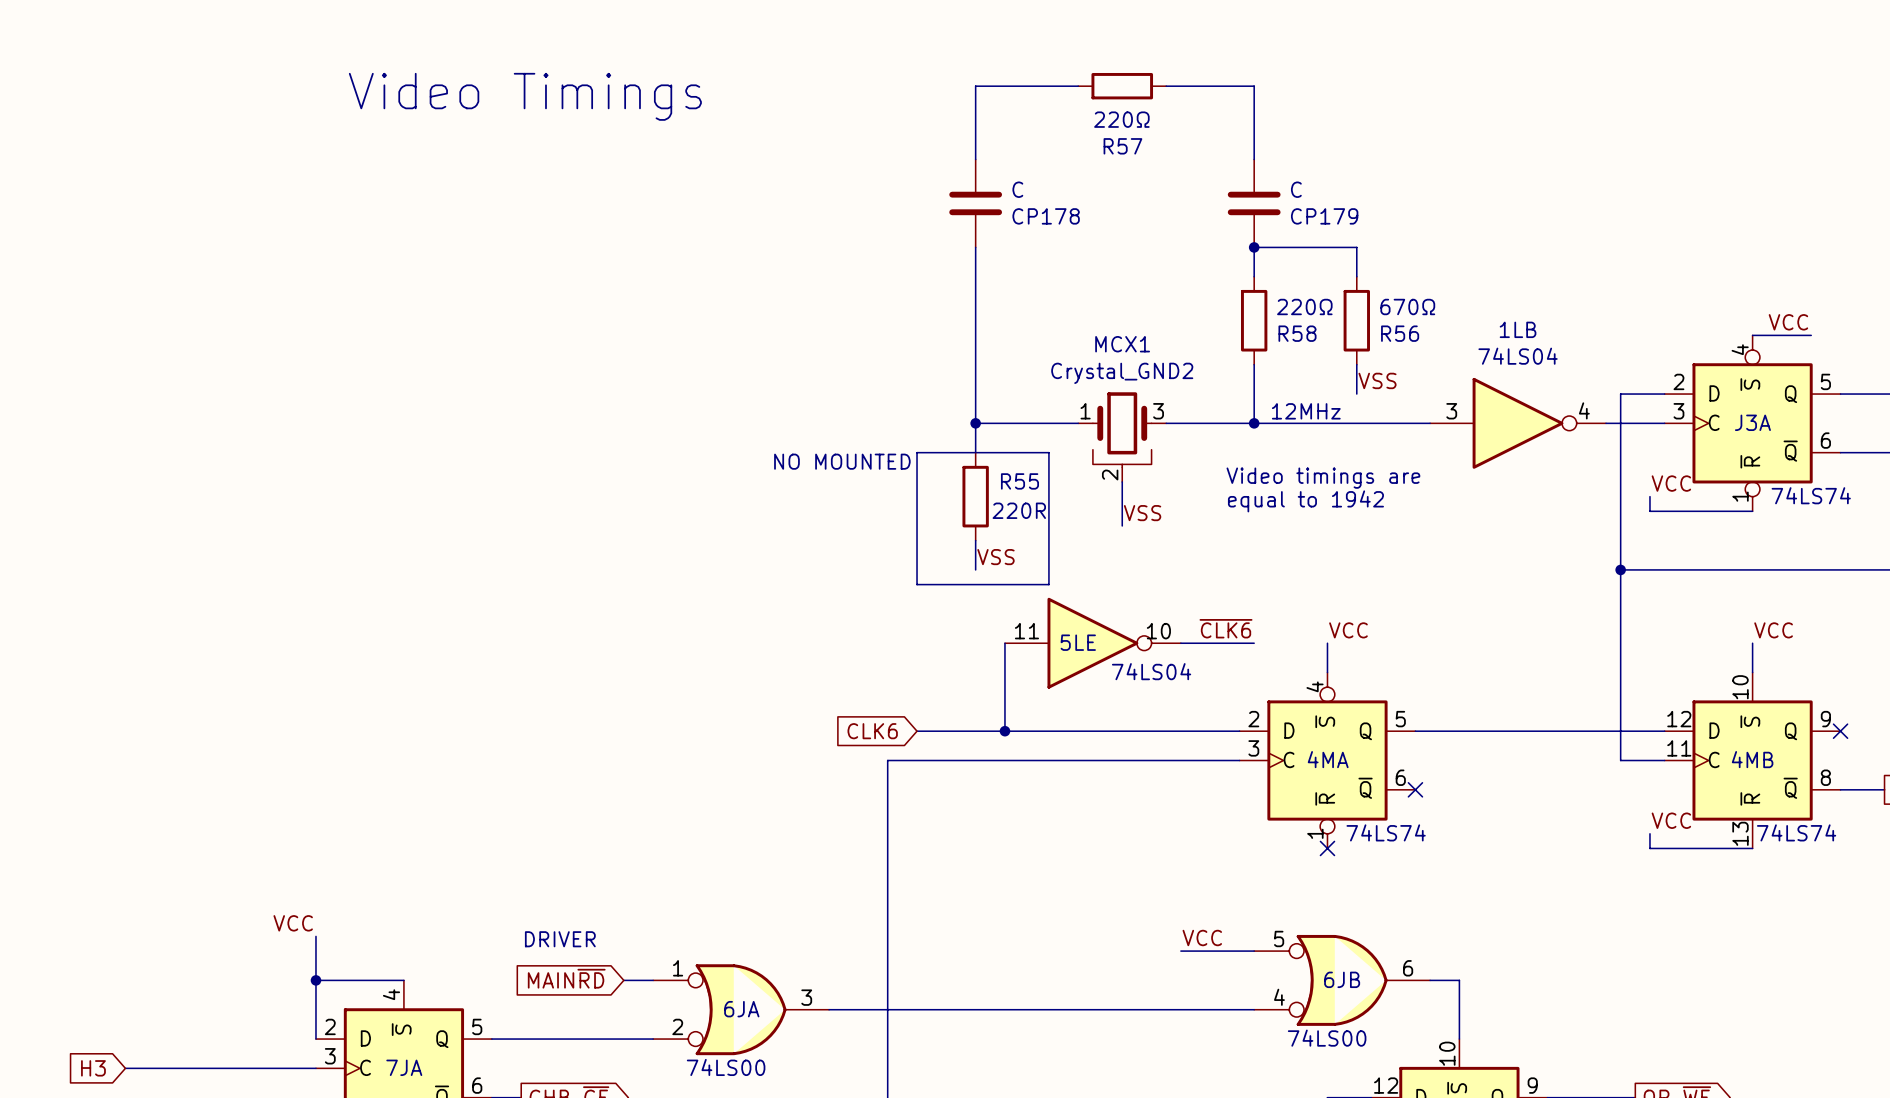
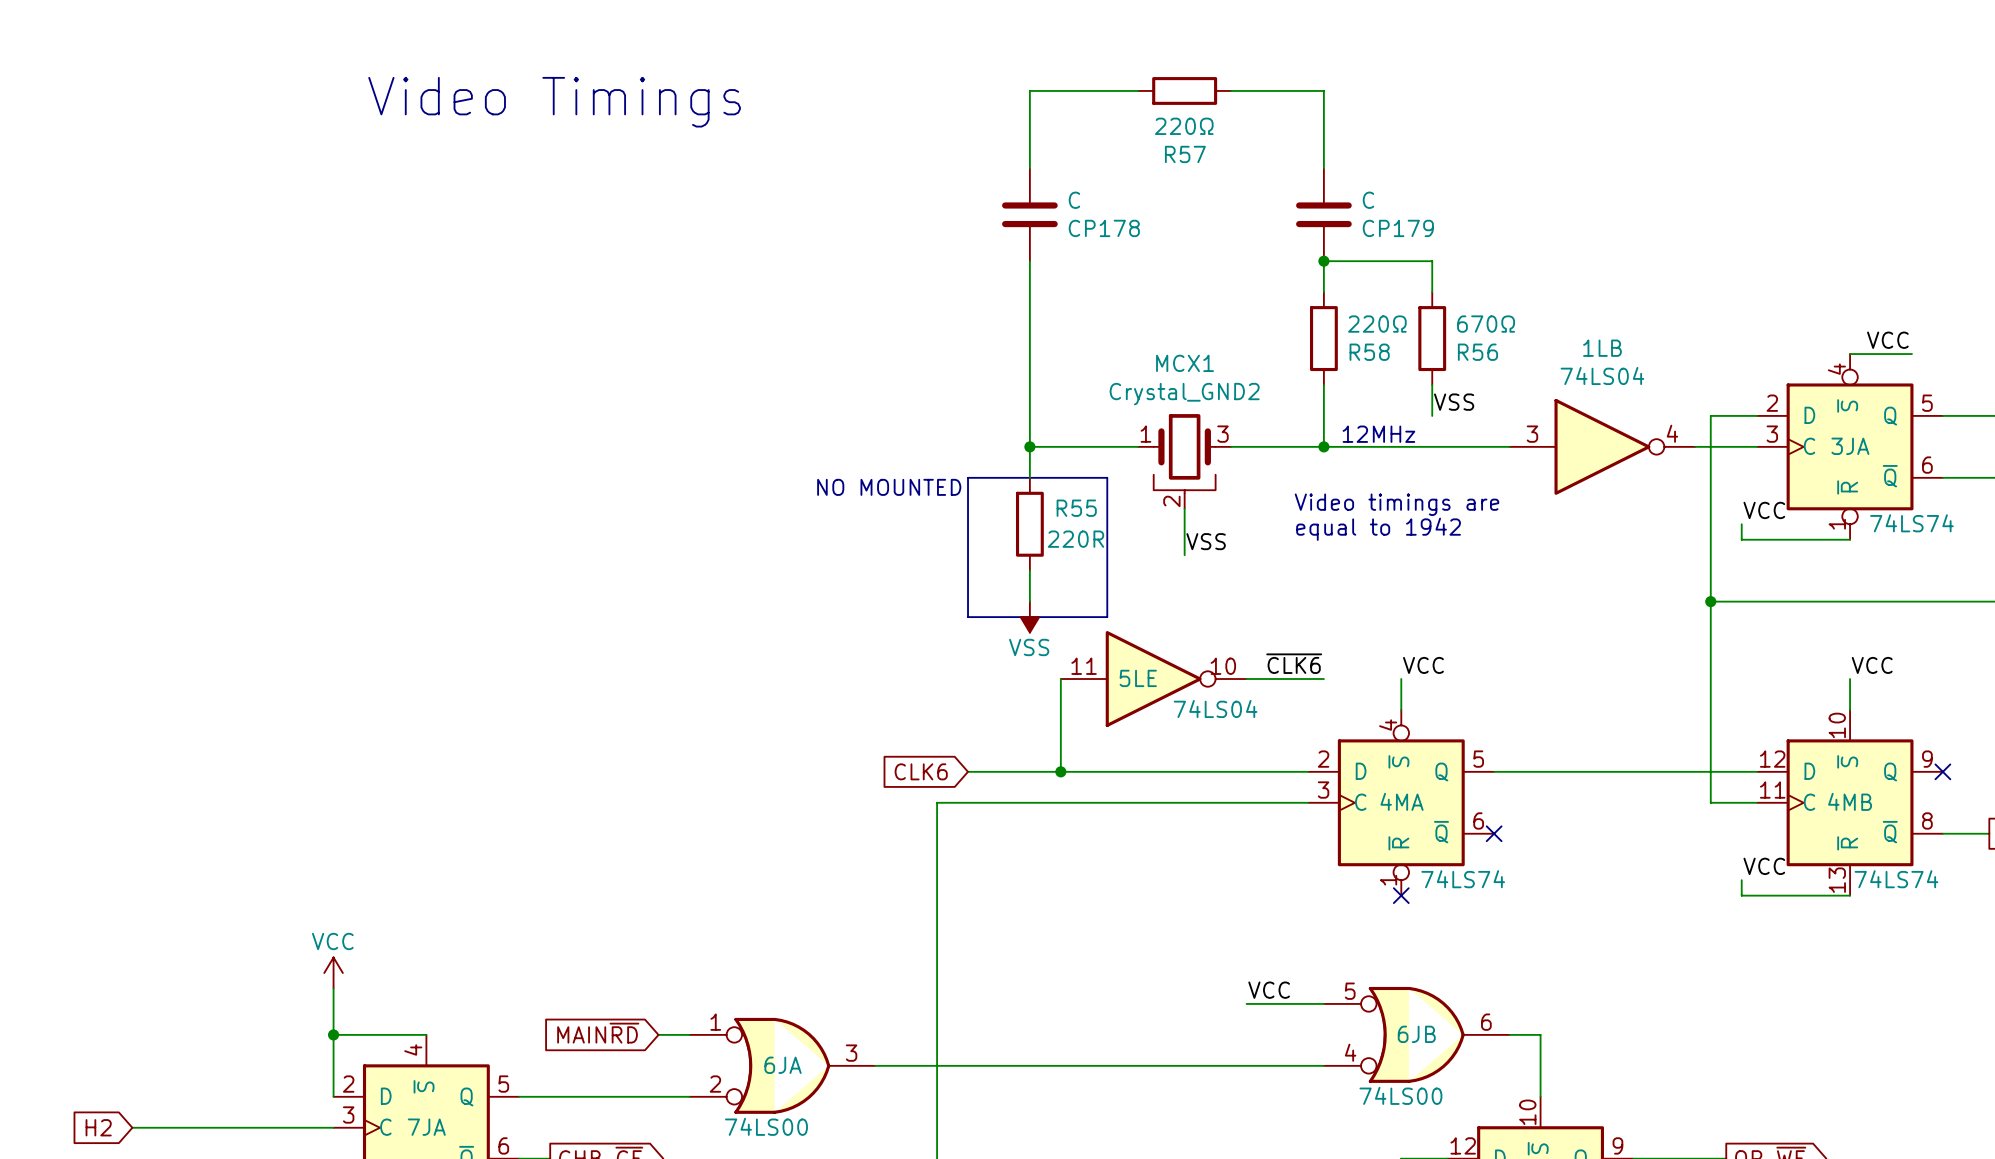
J3A name: J3A (1752, 422) -> 3JA (1850, 446)
label: VSS (995, 557) -> none
power symbol: none -> VSS (1029, 617)
power symbol: none -> VCC (333, 973)
label: VCC (293, 923) -> none
text: DRIVER (560, 939) -> none
global label: H3 (93, 1068) -> H2 (98, 1127)

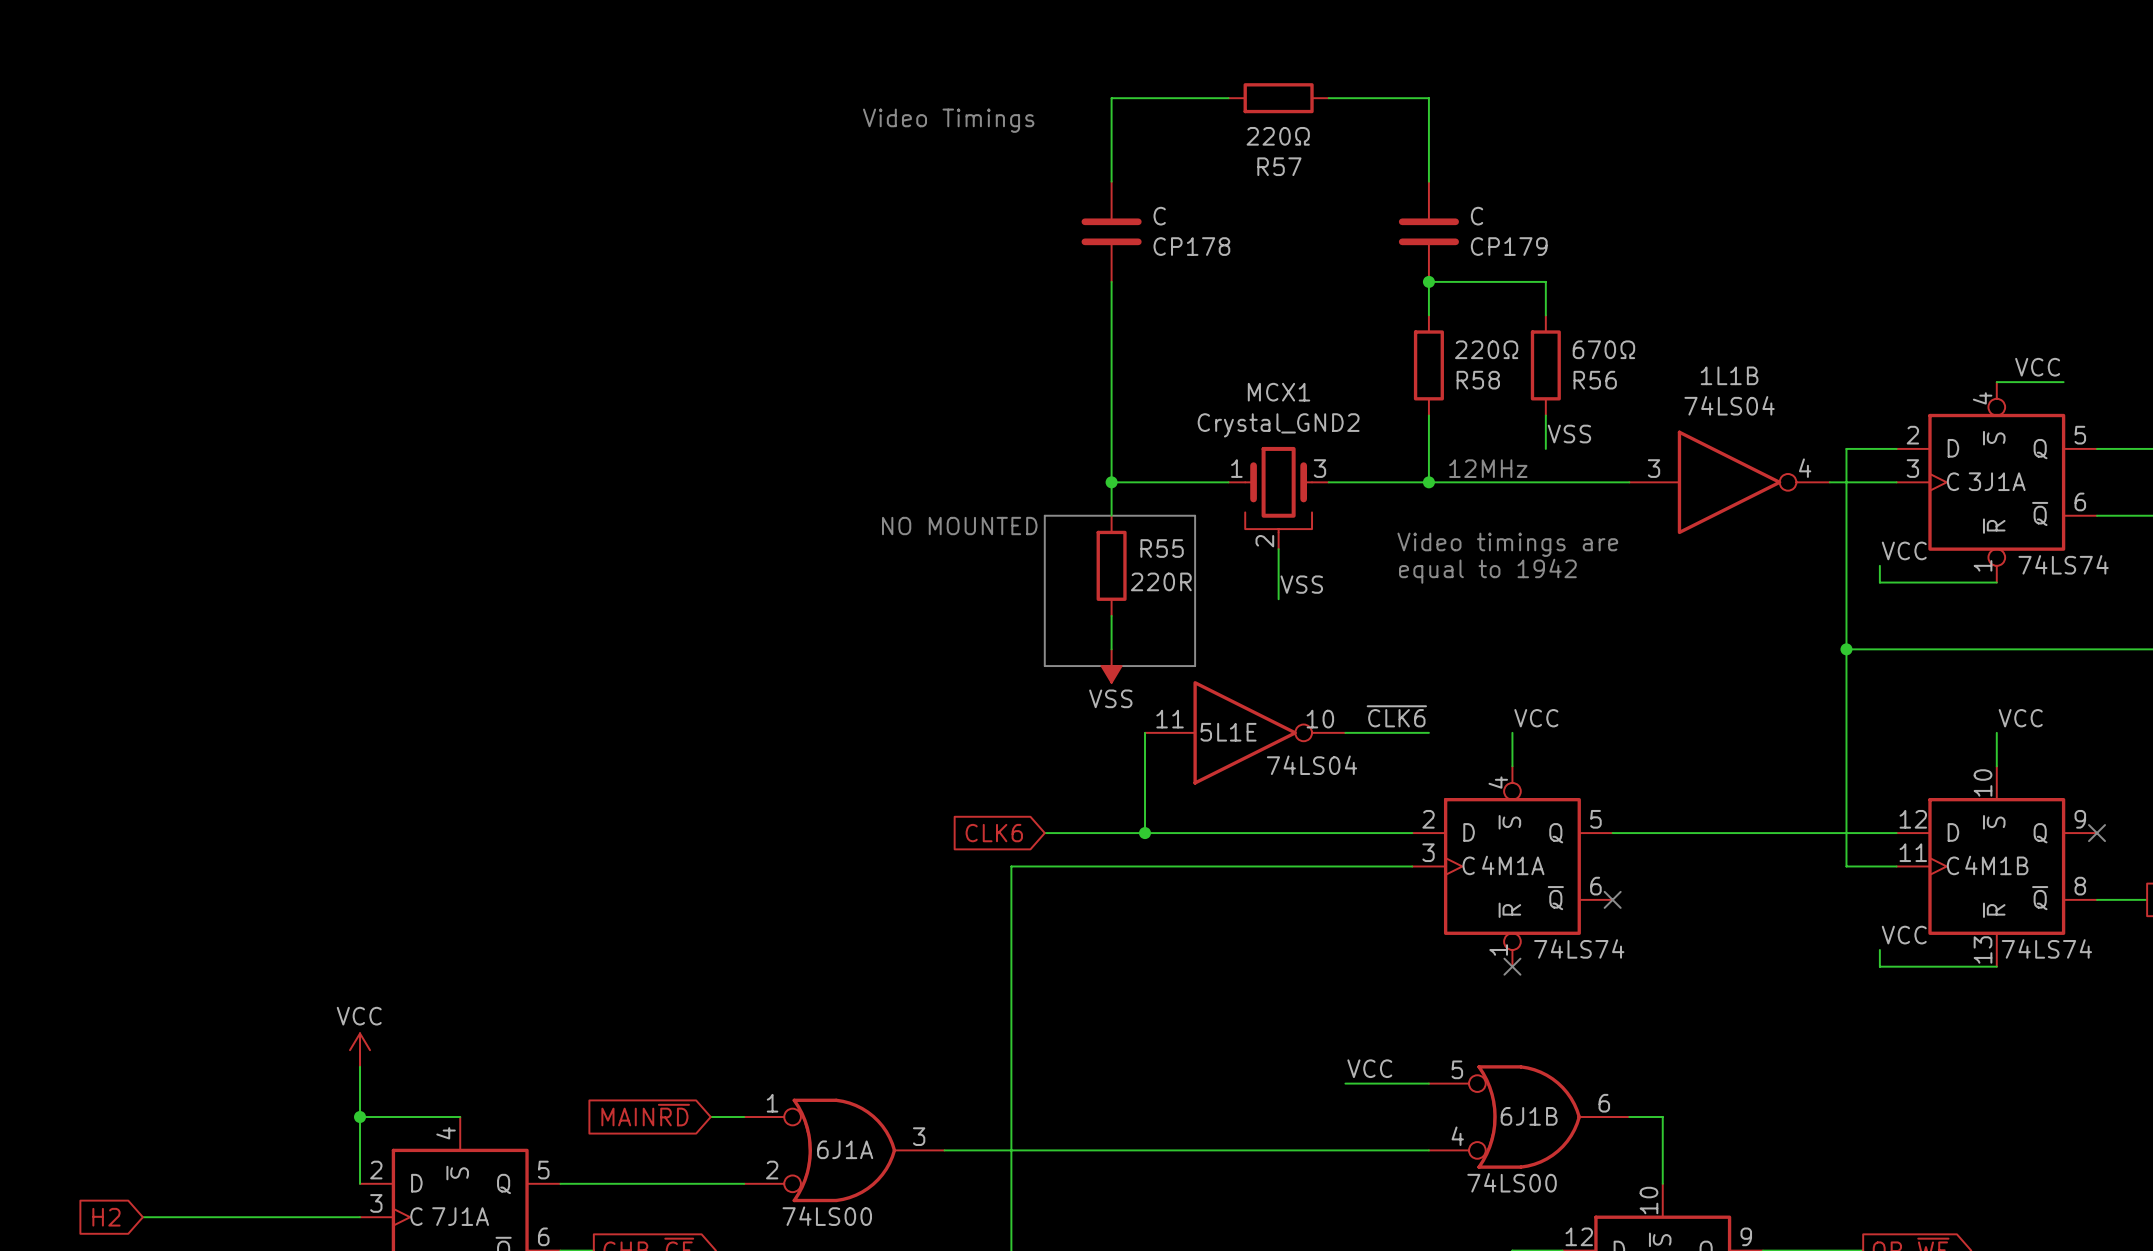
text: Video Timings (554, 102) -> none
text: none -> Video Timings (948, 120)
1LB name: 1LB (1602, 348) -> 1L1B (1729, 375)
3JA name: 3JA (1850, 446) -> 3J1A (1997, 481)
5LE name: 5LE (1138, 678) -> 5L1E (1228, 732)
4MA name: 4MA (1402, 801) -> 4M1A (1513, 865)
4MB name: 4MB (1850, 801) -> 4M1B (1996, 865)
6JB name: 6JB (1416, 1034) -> 6J1B (1529, 1116)
6JA name: 6JA (783, 1065) -> 6J1A (845, 1149)
7JA name: 7JA (426, 1127) -> 7J1A (460, 1216)

